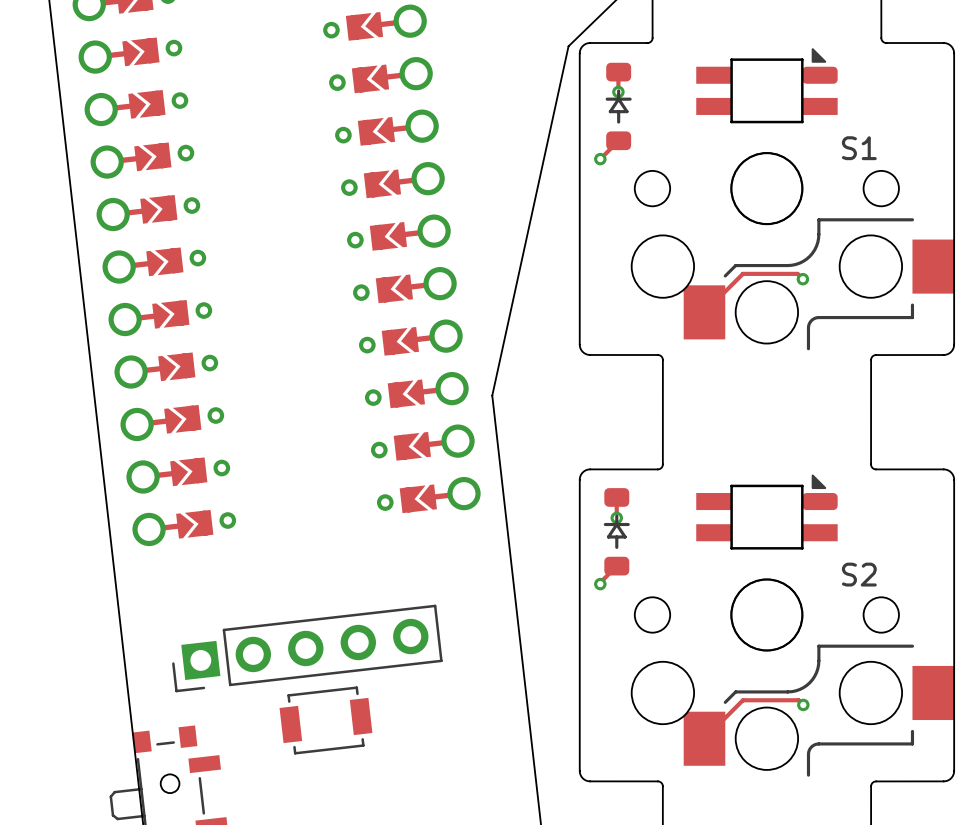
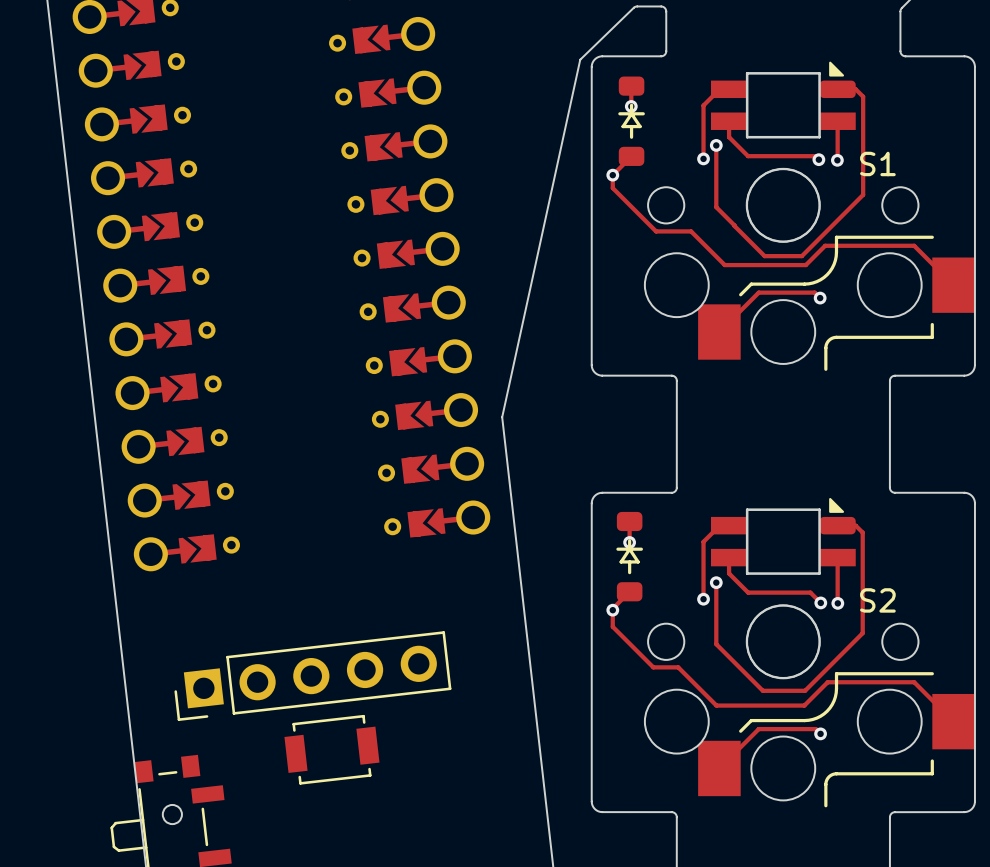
track: none -> (729, 89) (719, 89) (703, 105) (703, 158)
track: none -> (837, 89) (855, 89) (863, 96) (863, 194) (801, 256) (764, 256) (716, 207) (716, 145)
track: none -> (729, 121) (729, 137) (748, 156) (815, 156) (818, 159)
track: none -> (837, 121) (837, 160)
via: none -> (716, 145)
via: none -> (703, 158)
via: none -> (818, 159)
via: none -> (837, 160)
track: none -> (612, 175) (612, 188) (656, 231) (691, 231) (724, 265) (805, 265) (825, 245) (914, 245) (953, 285)
track: none -> (729, 525) (719, 525) (703, 541) (703, 599)
track: none -> (837, 525) (855, 525) (862, 532) (862, 633) (805, 690) (762, 690) (716, 644) (716, 582)
track: none -> (729, 557) (729, 573) (748, 592) (810, 592) (820, 602)
track: none -> (837, 557) (837, 603)
via: none -> (716, 582)
via: none -> (703, 599)
via: none -> (820, 602)
via: none -> (837, 603)
track: none -> (612, 610) (612, 626) (653, 667) (678, 667) (716, 705) (804, 705) (827, 682) (914, 682) (953, 721)

